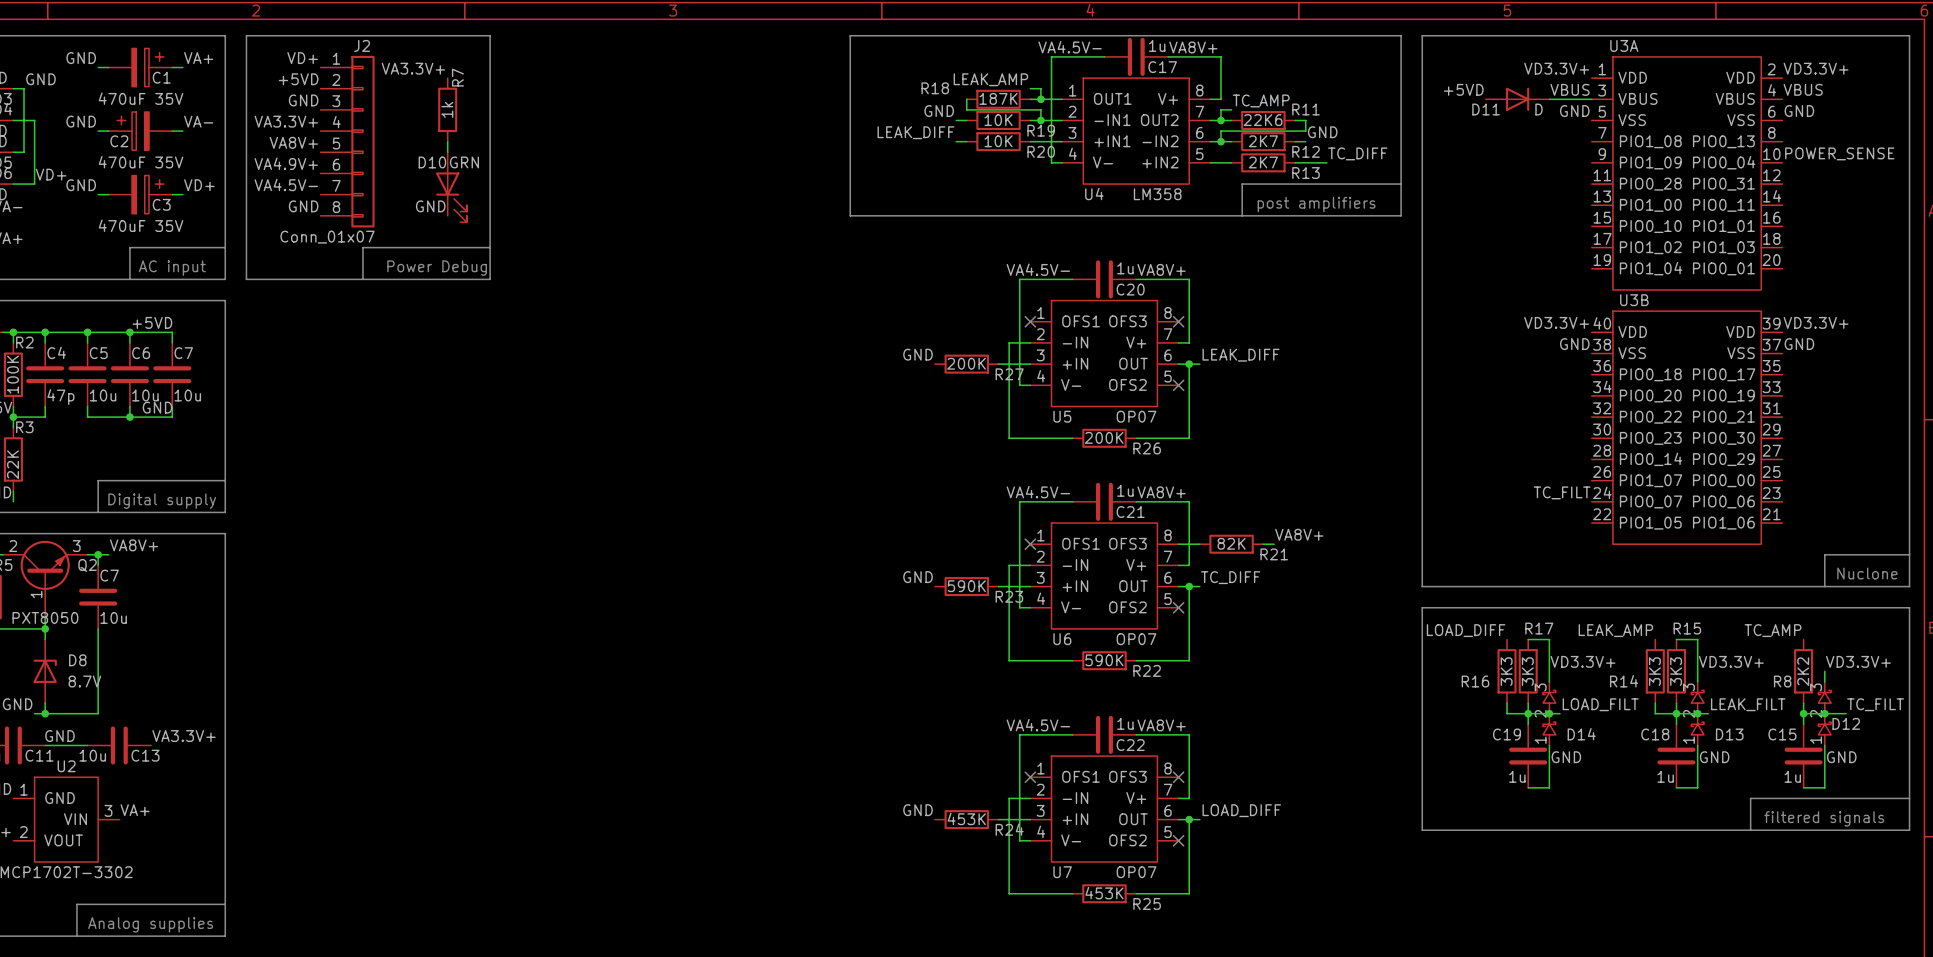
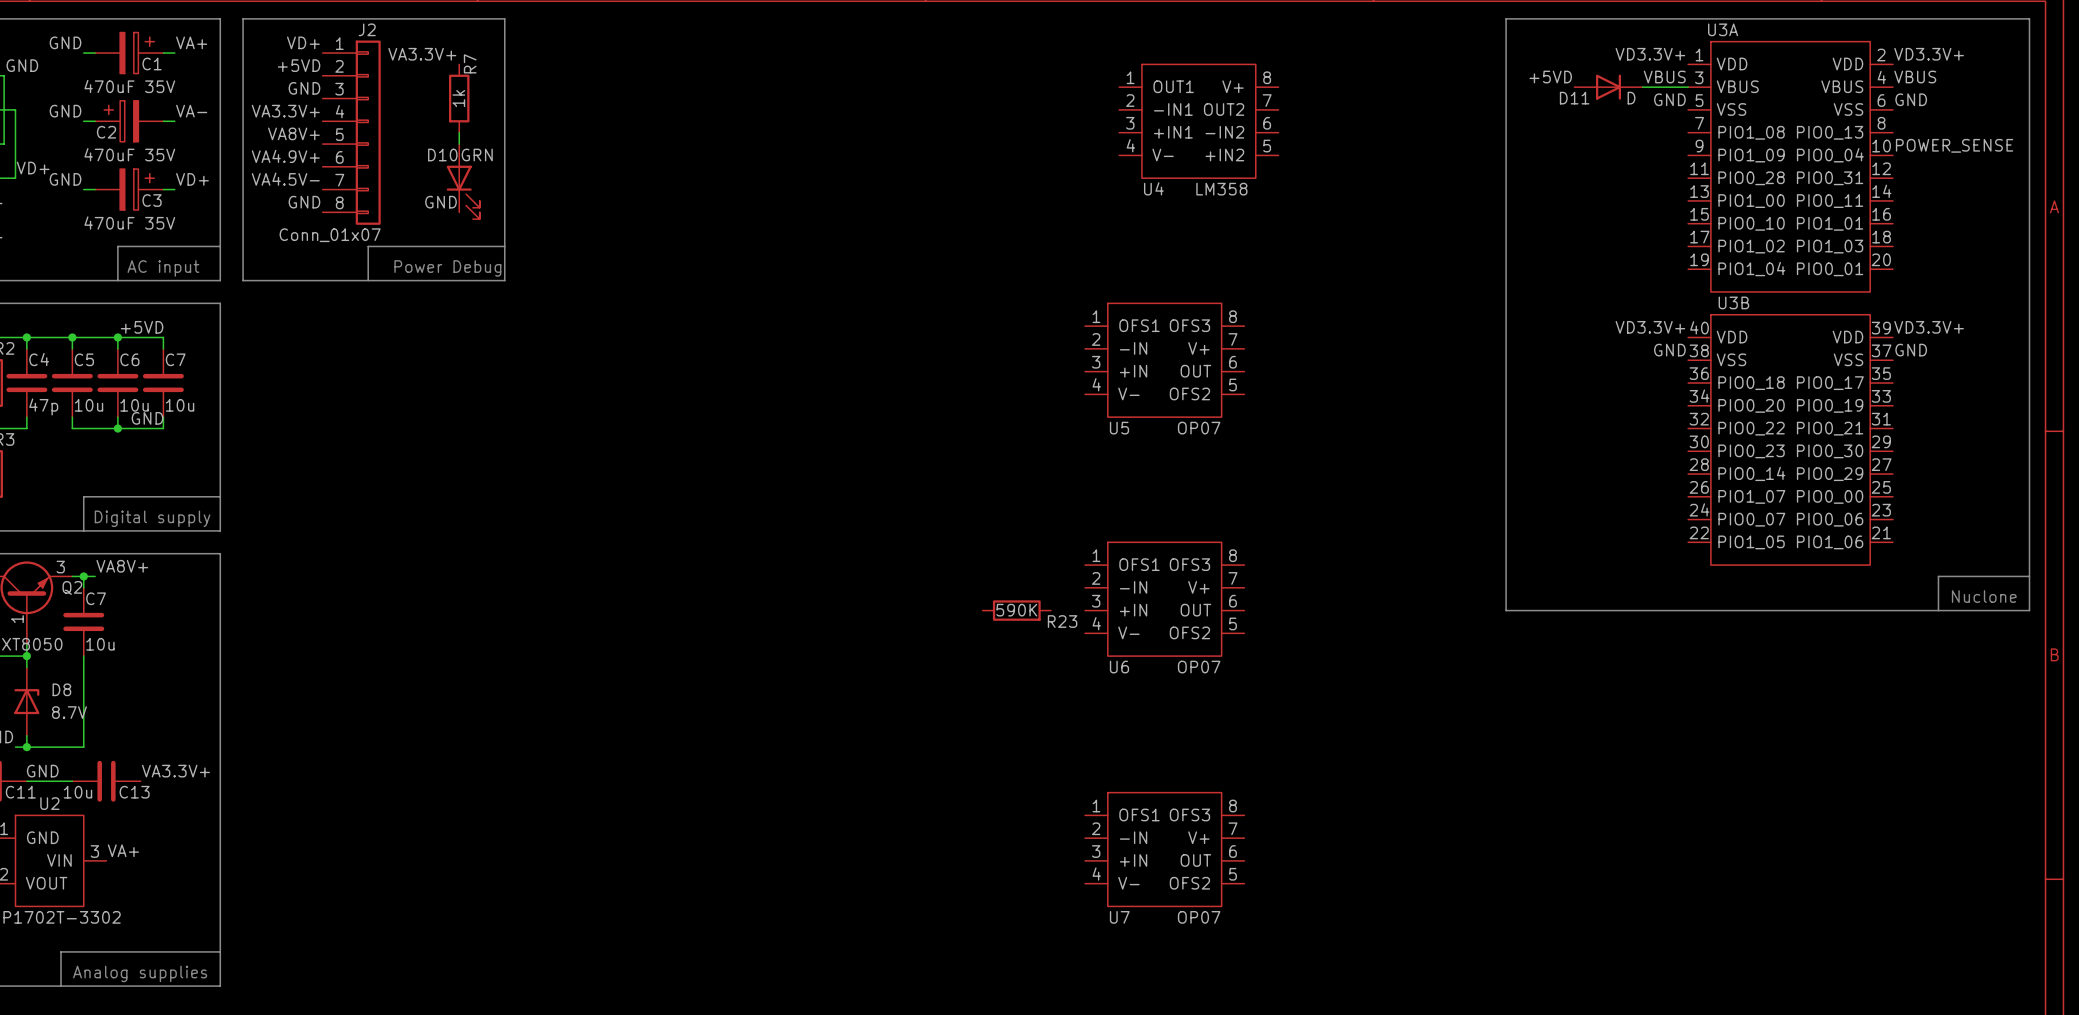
line: (850, 35) (1401, 35) (1401, 215) (850, 215) (850, 35) -> none
label: VA4.5V- (1070, 47) -> none
label: VA8V+ (1193, 47) -> none
wire: (1104, 56) (1051, 56) (1051, 162) (1062, 162) -> none
C17: 1u (1136, 56) -> none
wire: (1168, 56) (1221, 56) (1221, 99) (1210, 99) -> none
label: LEAK_AMP (990, 79) -> none
wire: (1030, 88) (1040, 88) (1040, 99) -> none
wire: (966, 99) (966, 109) (1040, 109) (1040, 120) -> none
R18: 187K (998, 99) -> none
wire: (1030, 99) (1062, 99) -> none
junction: (1040, 99) -> none
label: TC_AMP (1261, 100) -> none
wire: (1231, 109) (1221, 109) (1221, 120) -> none
label: GND (939, 111) -> none
wire: (956, 120) (966, 120) -> none
R19: 10K (998, 120) -> none
wire: (1030, 120) (1062, 120) -> none
junction: (1040, 120) -> none
wire: (1210, 120) (1231, 120) -> none
junction: (1221, 120) -> none
R11: 22K6 (1263, 120) -> none
wire: (1295, 120) (1305, 120) (1305, 131) (1221, 131) (1221, 141) -> none
label: LEAK_DIFF (915, 132) -> none
label: GND (1322, 132) -> none
wire: (956, 141) (966, 141) -> none
R20: 10K (998, 141) -> none
wire: (1030, 141) (1062, 141) -> none
wire: (1210, 141) (1231, 141) -> none
junction: (1221, 141) -> none
R12: 2K7 (1263, 141) -> none
wire: (1295, 141) (1305, 141) -> none
label: TC_DIFF (1357, 153) -> none
wire: (1210, 162) (1231, 162) -> none
R13: 2K7 (1263, 162) -> none
wire: (1295, 162) (1326, 162) -> none
line: (1401, 184) (1242, 184) (1242, 215) -> none
text: post amplifiers (1316, 204) -> none
label: VA4.5V- (1038, 269) -> none
label: VA8V+ (1161, 269) -> none
wire: (1072, 279) (1019, 279) (1019, 385) (1030, 385) -> none
C20: 1u (1104, 279) -> none
wire: (1136, 279) (1189, 279) (1189, 342) (1178, 342) -> none
no-connect mark: (1030, 321) -> none
no-connect mark: (1178, 321) -> none
wire: (1030, 342) (1009, 342) (1009, 438) (1072, 438) -> none
label: GND (918, 354) -> none
label: LEAK_DIFF (1241, 355) -> none
R27: 200K (966, 364) -> none
wire: (998, 364) (1030, 364) -> none
wire: (1178, 364) (1199, 364) -> none
wire: (1189, 364) (1189, 438) (1136, 438) -> none
junction: (1189, 364) -> none
no-connect mark: (1178, 385) -> none
R26: 200K (1104, 438) -> none
label: VA4.5V- (1038, 492) -> none
label: VA8V+ (1161, 492) -> none
label: TC_FILT (1562, 492) -> none
wire: (1072, 501) (1019, 501) (1019, 607) (1030, 607) -> none
C21: 1u (1104, 501) -> none
wire: (1136, 501) (1189, 501) (1189, 565) (1178, 565) -> none
label: VA8V+ (1299, 534) -> none
no-connect mark: (1030, 544) -> none
wire: (1178, 544) (1199, 544) -> none
R21: 82K (1231, 544) -> none
wire: (1263, 544) (1273, 544) -> none
wire: (1030, 565) (1009, 565) (1009, 660) (1072, 660) -> none
label: GND (918, 577) -> none
label: TC_DIFF (1230, 577) -> none
wire: (998, 586) (1030, 586) -> none
wire: (1178, 586) (1199, 586) -> none
wire: (1189, 586) (1189, 660) (1136, 660) -> none
junction: (1189, 586) -> none
no-connect mark: (1178, 607) -> none
line: (1422, 607) (1422, 830) (1909, 830) (1909, 607) (1422, 607) -> none
label: LOAD_DIFF (1466, 630) -> none
label: LEAK_AMP (1615, 630) -> none
label: TC_AMP (1773, 630) -> none
wire: (1528, 639) (1549, 639) (1549, 681) -> none
wire: (1676, 639) (1697, 639) (1697, 681) -> none
R22: 590K (1104, 660) -> none
label: VD3.3V+ (1583, 661) -> none
label: VD3.3V+ (1731, 661) -> none
label: VD3.3V+ (1858, 661) -> none
R16: 3K3 (1507, 671) -> none
R17: 3K3 (1528, 671) -> none
R14: 3K3 (1655, 671) -> none
R15: 3K3 (1676, 671) -> none
R8: 2K2 (1803, 671) -> none
wire: (1824, 671) (1824, 681) -> none
wire: (1507, 703) (1507, 713) (1559, 713) -> none
wire: (1528, 703) (1528, 724) -> none
wire: (1655, 703) (1655, 713) (1708, 713) -> none
wire: (1676, 703) (1676, 724) -> none
wire: (1803, 703) (1803, 724) -> none
label: LOAD_FILT (1600, 704) -> none
label: LEAK_FILT (1748, 704) -> none
label: TC_FILT (1875, 704) -> none
junction: (1528, 713) -> none
junction: (1549, 713) -> none
D14: (1549, 713) -> none
junction: (1676, 713) -> none
junction: (1697, 713) -> none
D13: (1697, 713) -> none
wire: (1803, 713) (1845, 713) -> none
junction: (1803, 713) -> none
junction: (1824, 713) -> none
D12: (1824, 713) -> none
label: VA4.5V- (1038, 725) -> none
label: VA8V+ (1161, 725) -> none
wire: (1072, 734) (1019, 734) (1019, 840) (1030, 840) -> none
C22: 1u (1104, 734) -> none
wire: (1136, 734) (1189, 734) (1189, 798) (1178, 798) -> none
wire: (1549, 745) (1549, 787) (1528, 787) -> none
wire: (1697, 745) (1697, 787) (1676, 787) -> none
wire: (1824, 745) (1824, 787) (1803, 787) -> none
C19: 1u (1528, 756) -> none
C18: 1u (1676, 756) -> none
C15: 1u (1803, 756) -> none
label: GND (1566, 757) -> none
label: GND (1714, 757) -> none
label: GND (1841, 757) -> none
no-connect mark: (1030, 777) -> none
no-connect mark: (1178, 777) -> none
wire: (1030, 798) (1009, 798) (1009, 893) (1072, 893) -> none
line: (1909, 798) (1750, 798) (1750, 830) -> none
label: GND (918, 810) -> none
label: LOAD_DIFF (1241, 810) -> none
text: filtered signals (1824, 818) -> none
R24: 453K (966, 819) -> none
wire: (998, 819) (1030, 819) -> none
wire: (1178, 819) (1199, 819) -> none
wire: (1189, 819) (1189, 893) (1136, 893) -> none
junction: (1189, 819) -> none
no-connect mark: (1178, 840) -> none
R25: 453K (1104, 893) -> none

